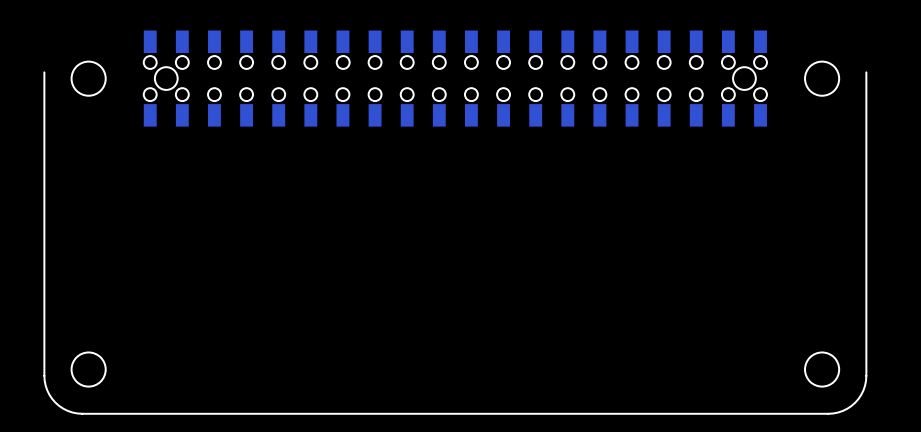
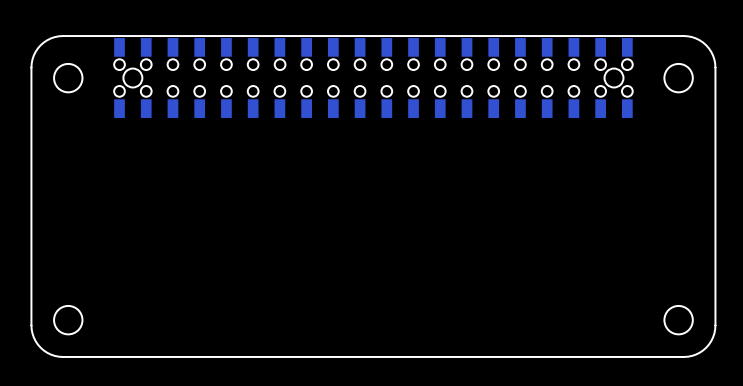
board edge: none -> (31, 72) (32, 59) (37, 48) (47, 40) (63, 36) (683, 36) (695, 38) (708, 48) (714, 59) (715, 72)

